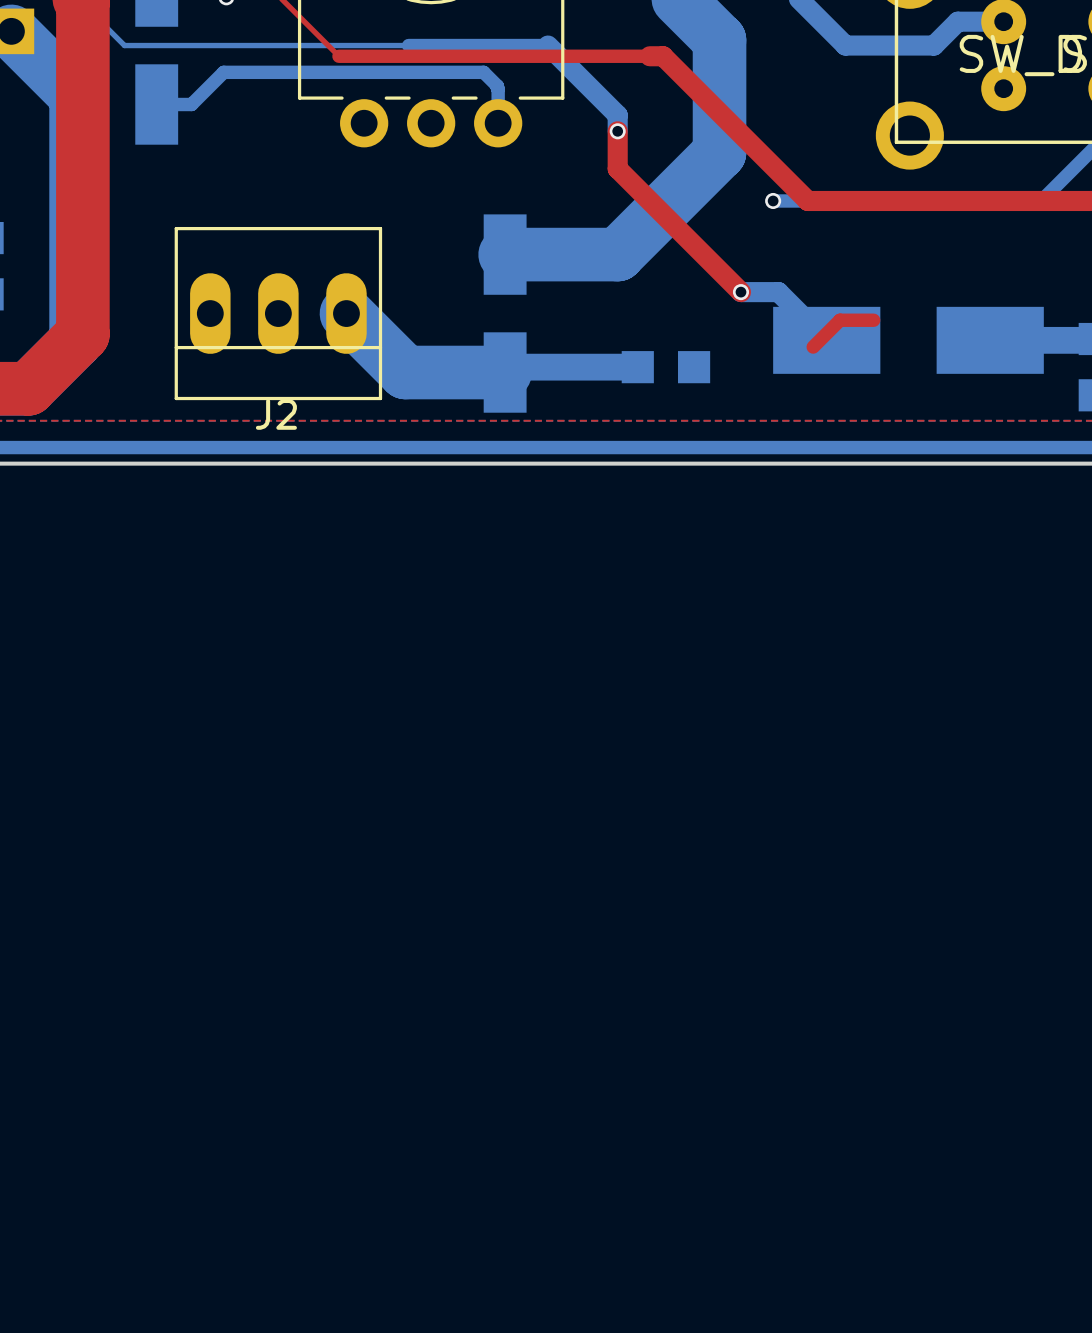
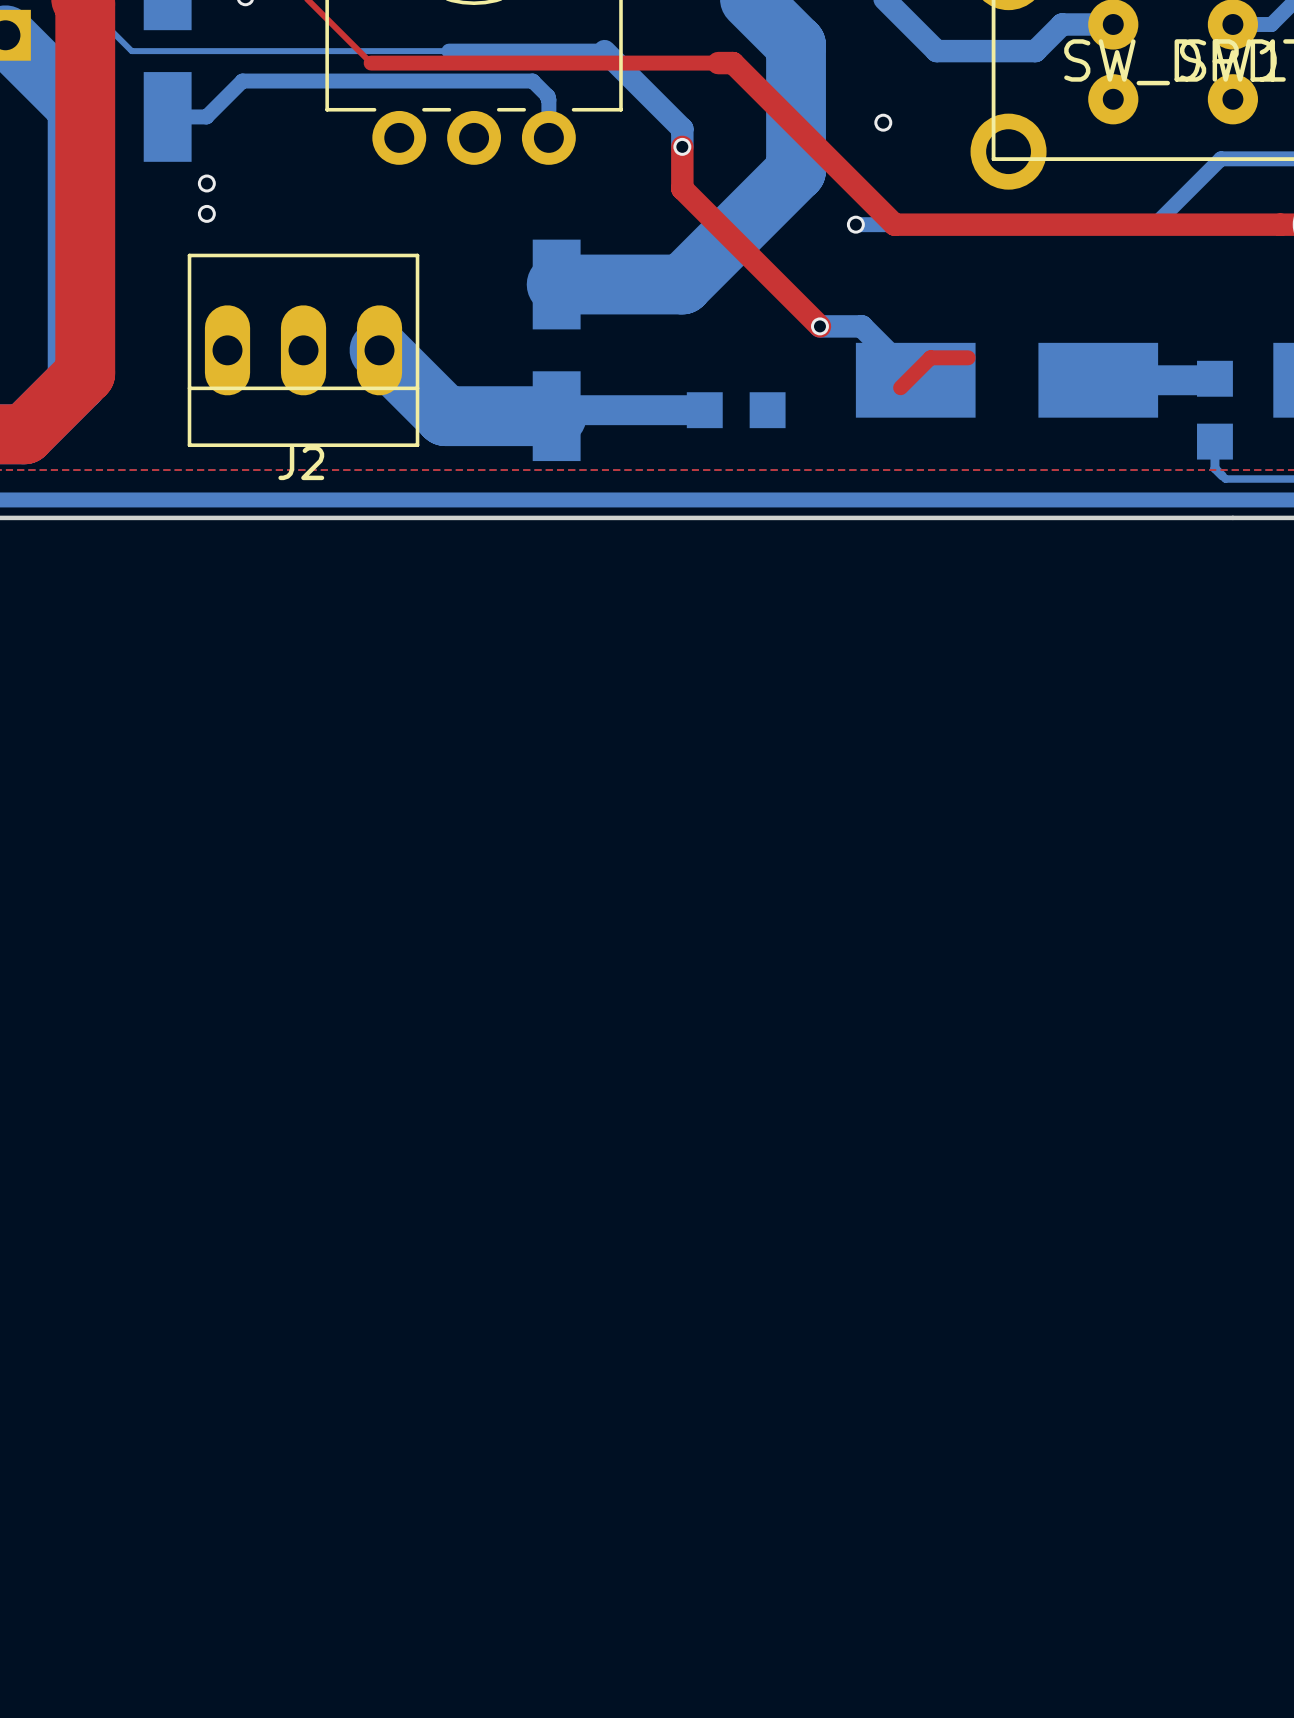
via: none -> (883, 122)
via: none -> (206, 183)
via: none -> (206, 213)

